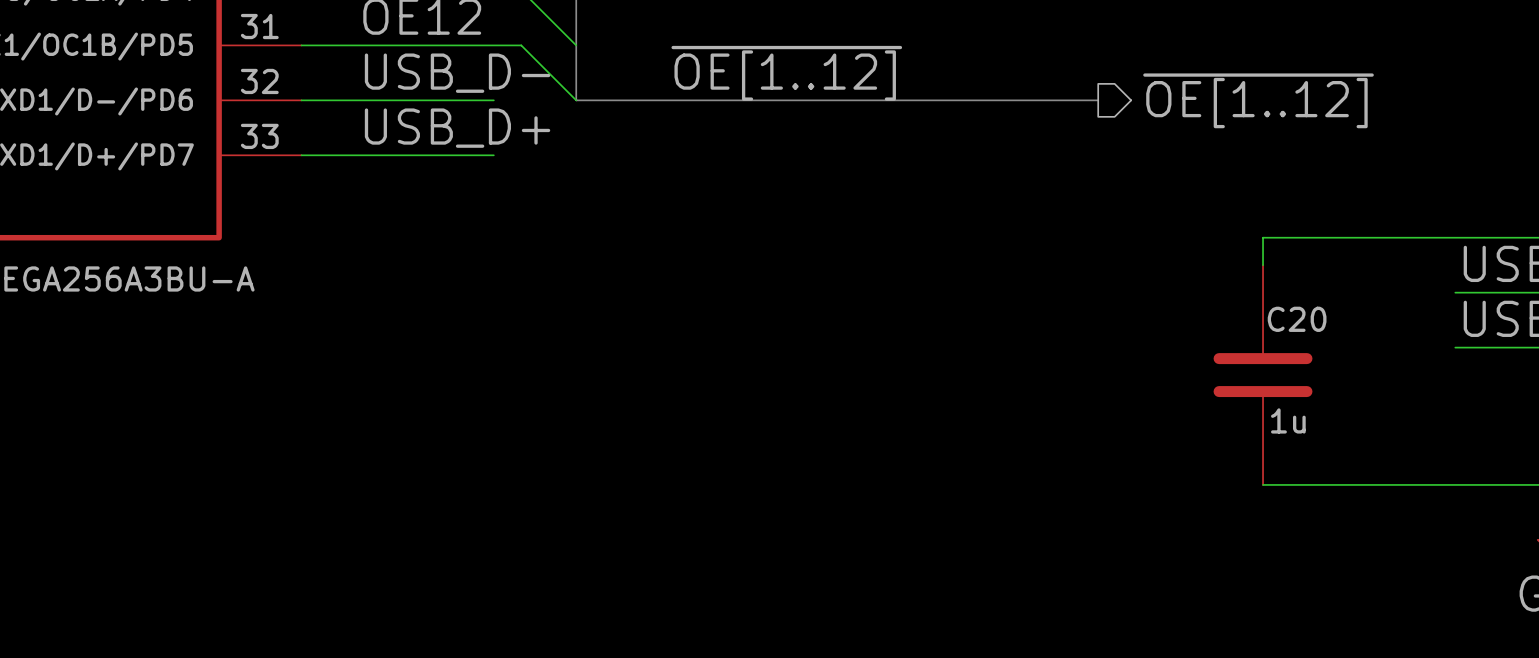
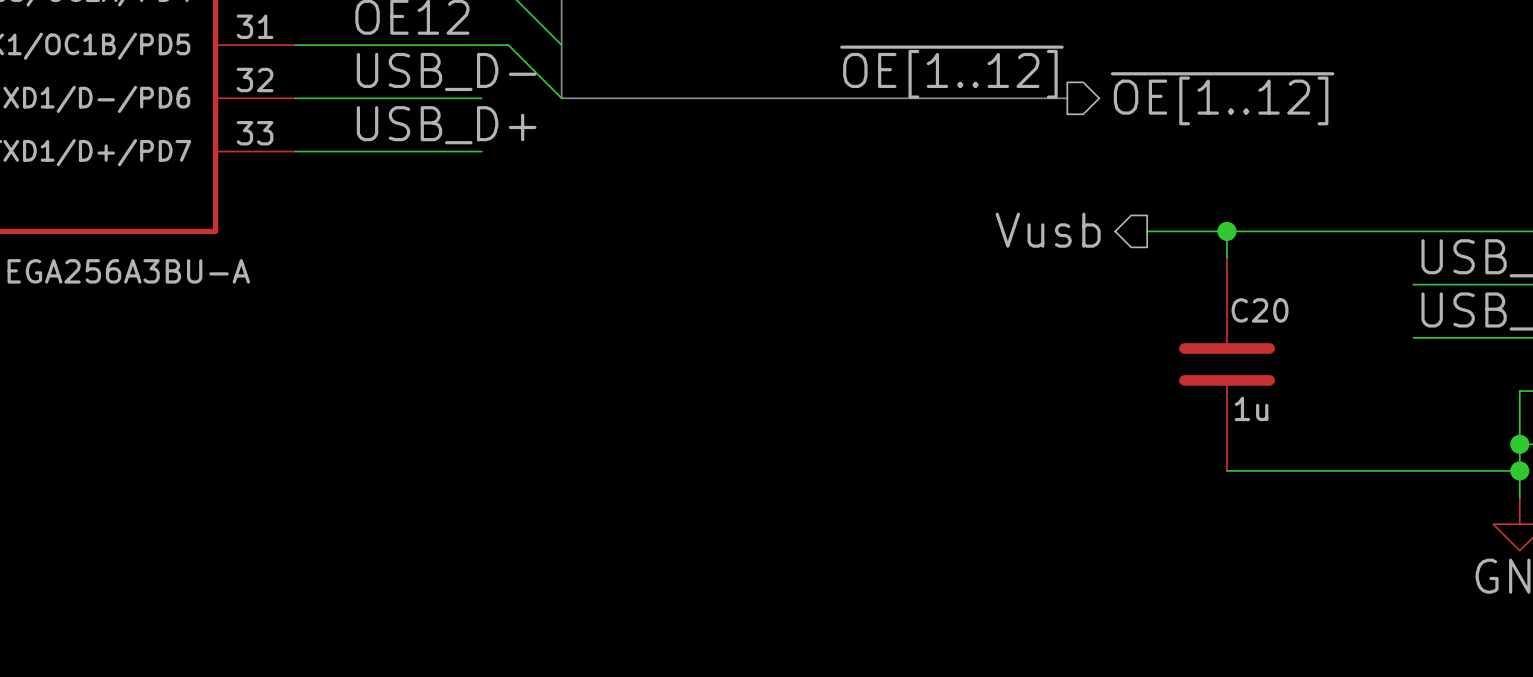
label position: ~{OE[1..12]} (786, 73) -> ~{OE[1..12]} (951, 72)
hierarchical label: none -> Vusb (1048, 230)
wire: none -> (1147, 231) (1227, 231)
junction: none -> (1227, 231)

